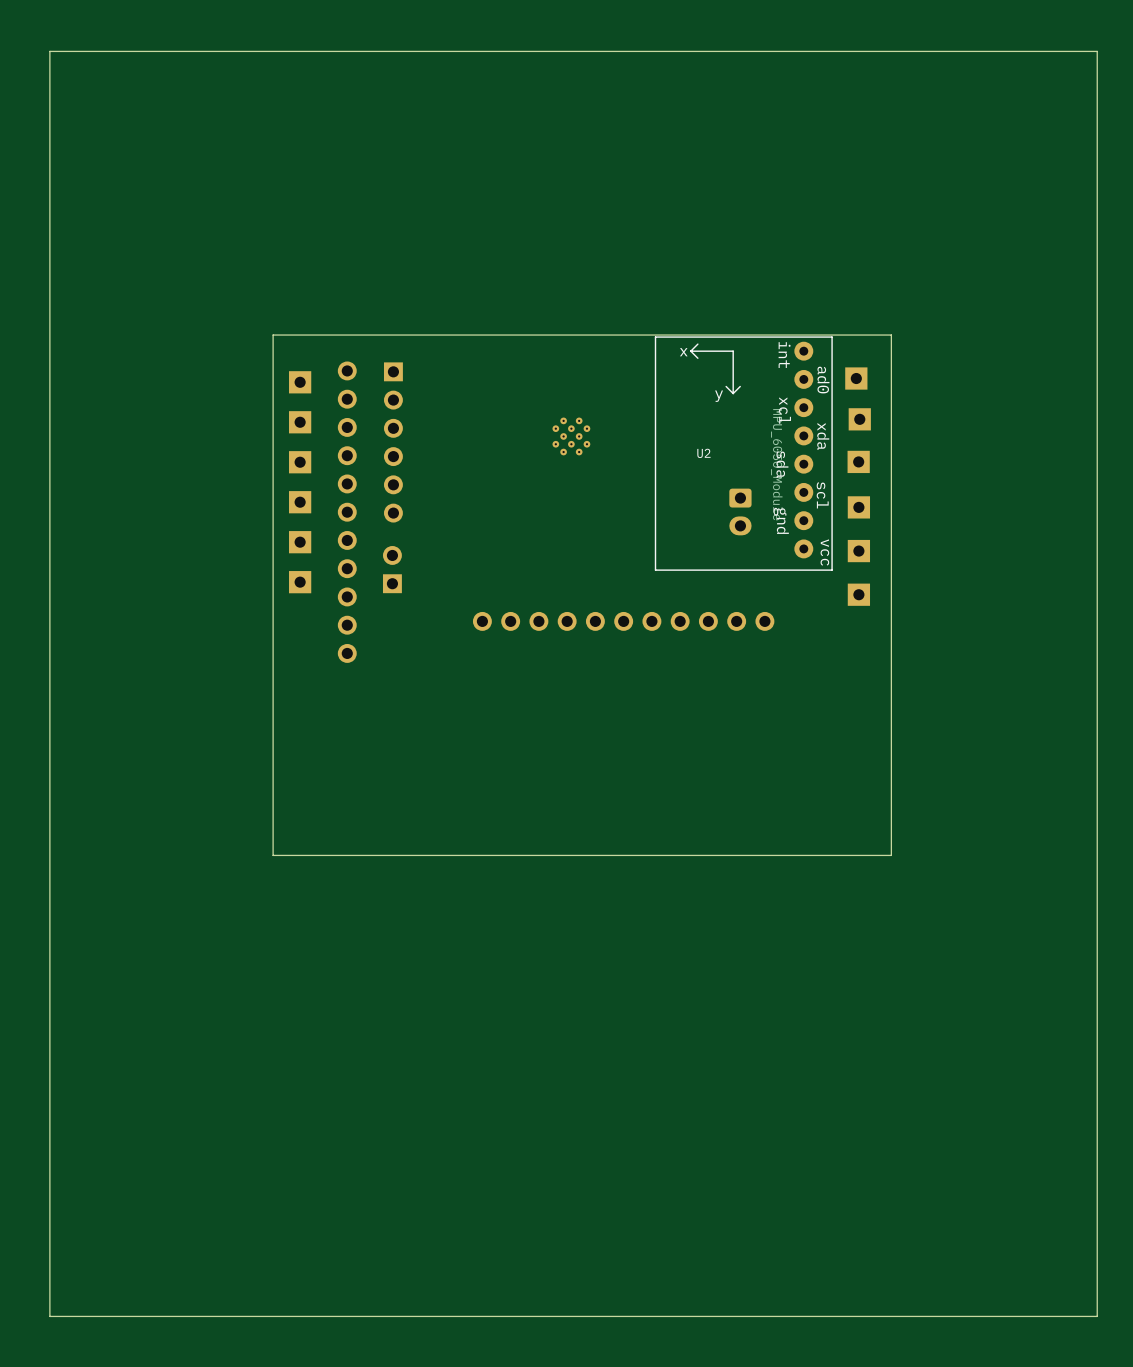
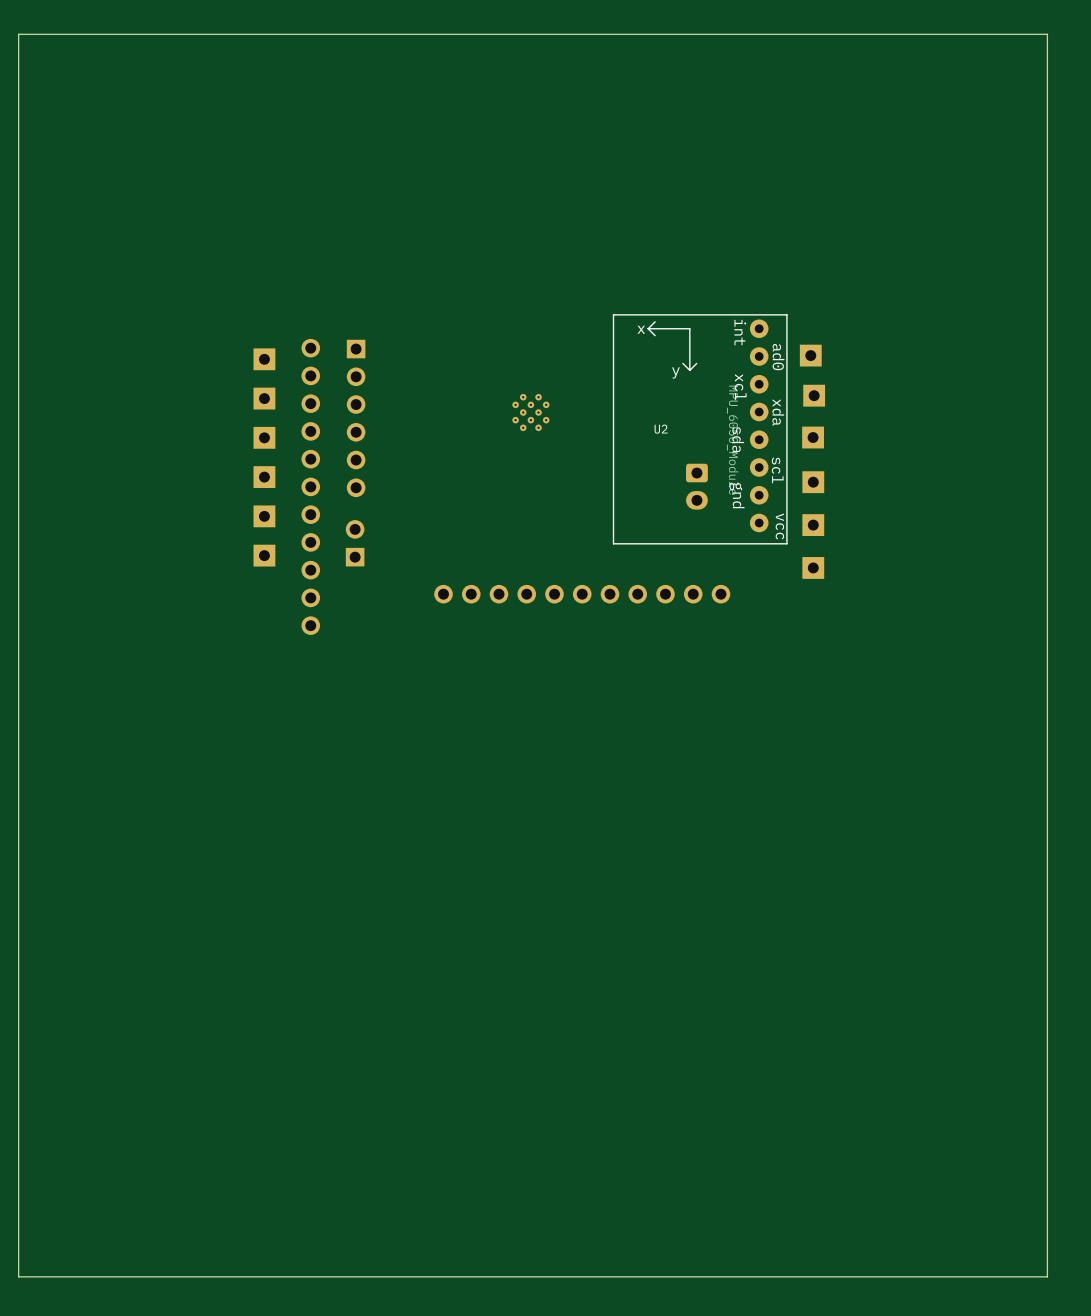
board edge: (891, 335) (273, 335) (273, 855) (891, 855) (891, 335) -> none

